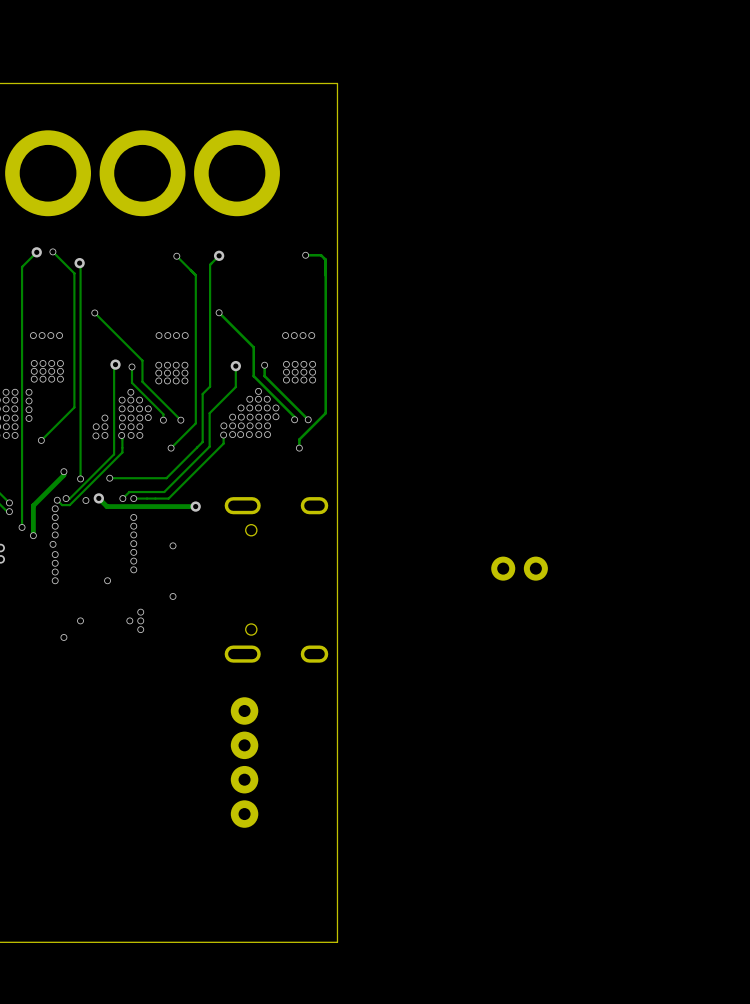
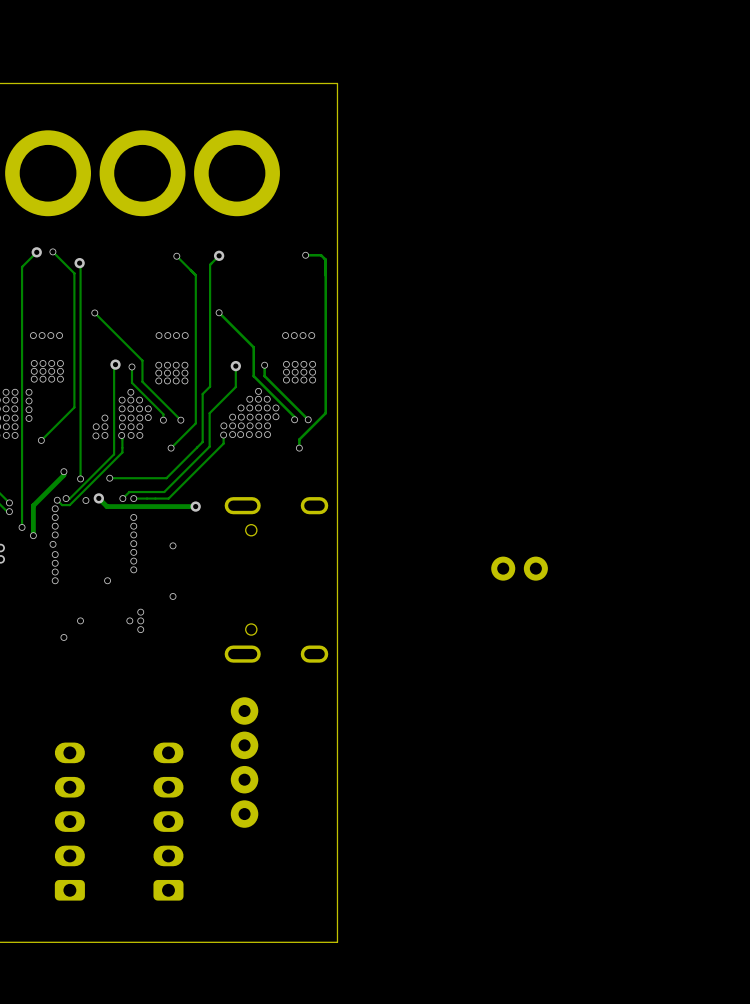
part: none -> (69, 821)
part: none -> (168, 821)

